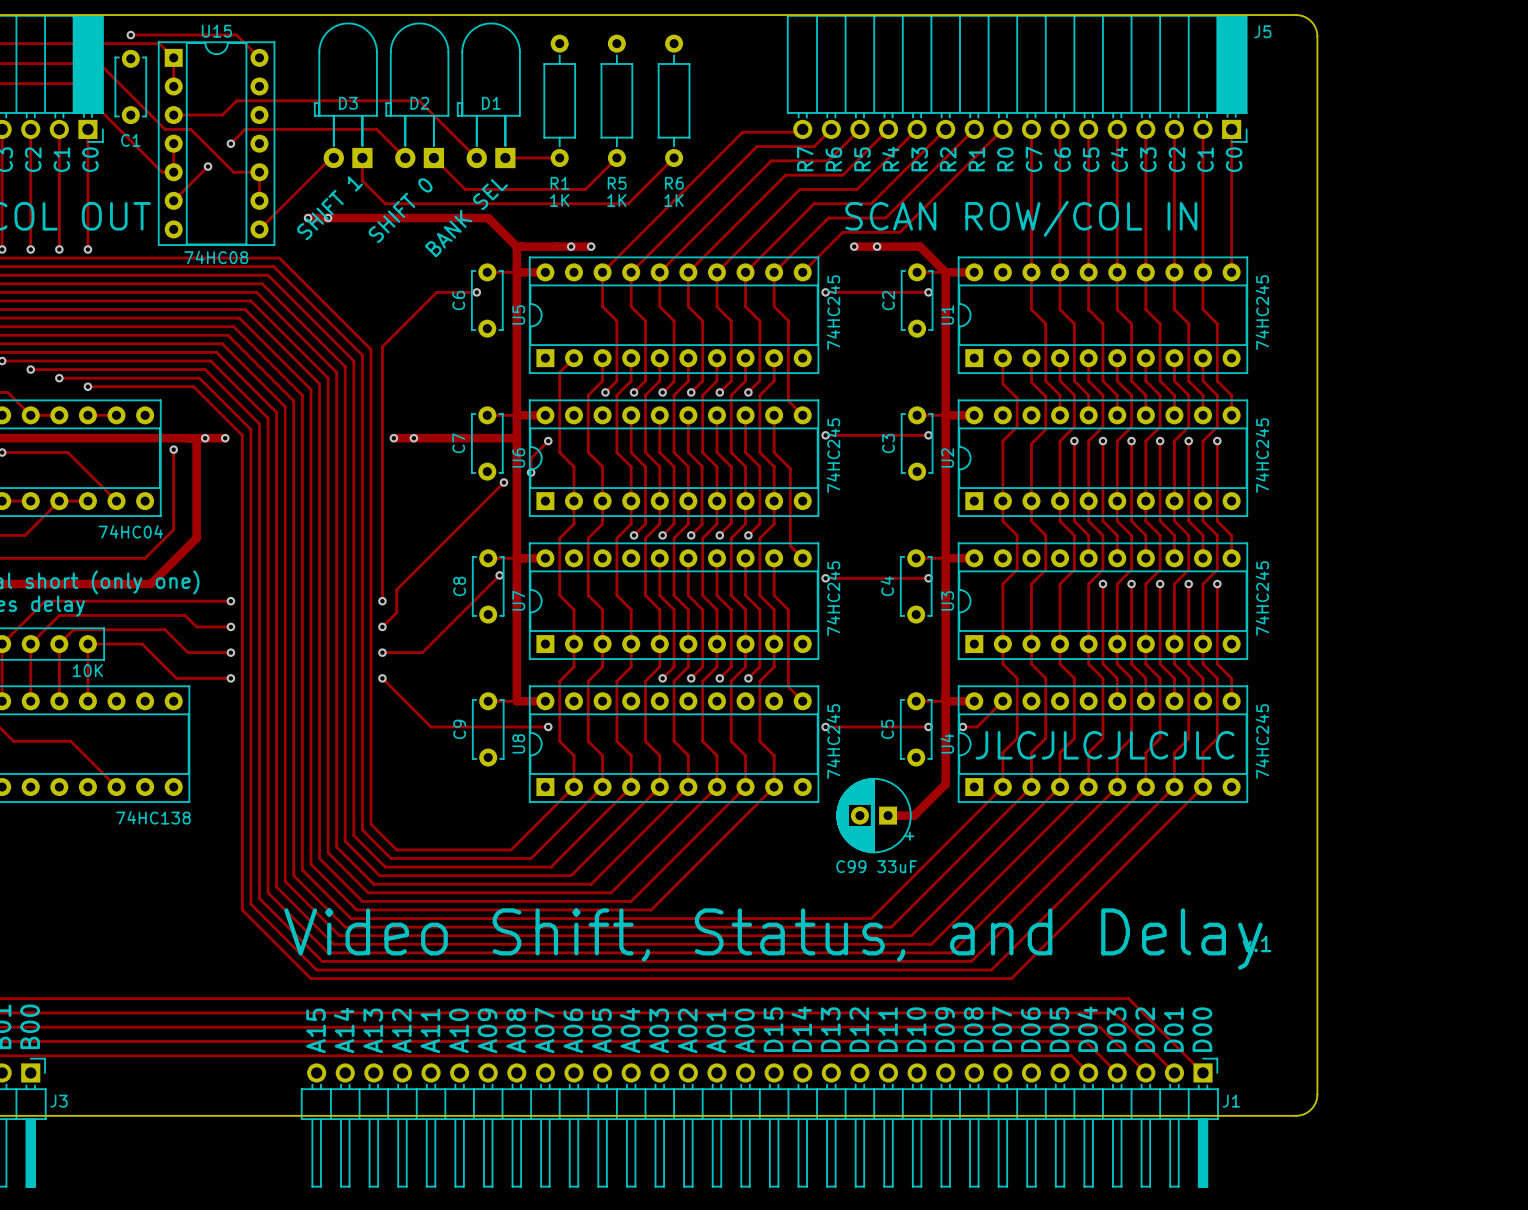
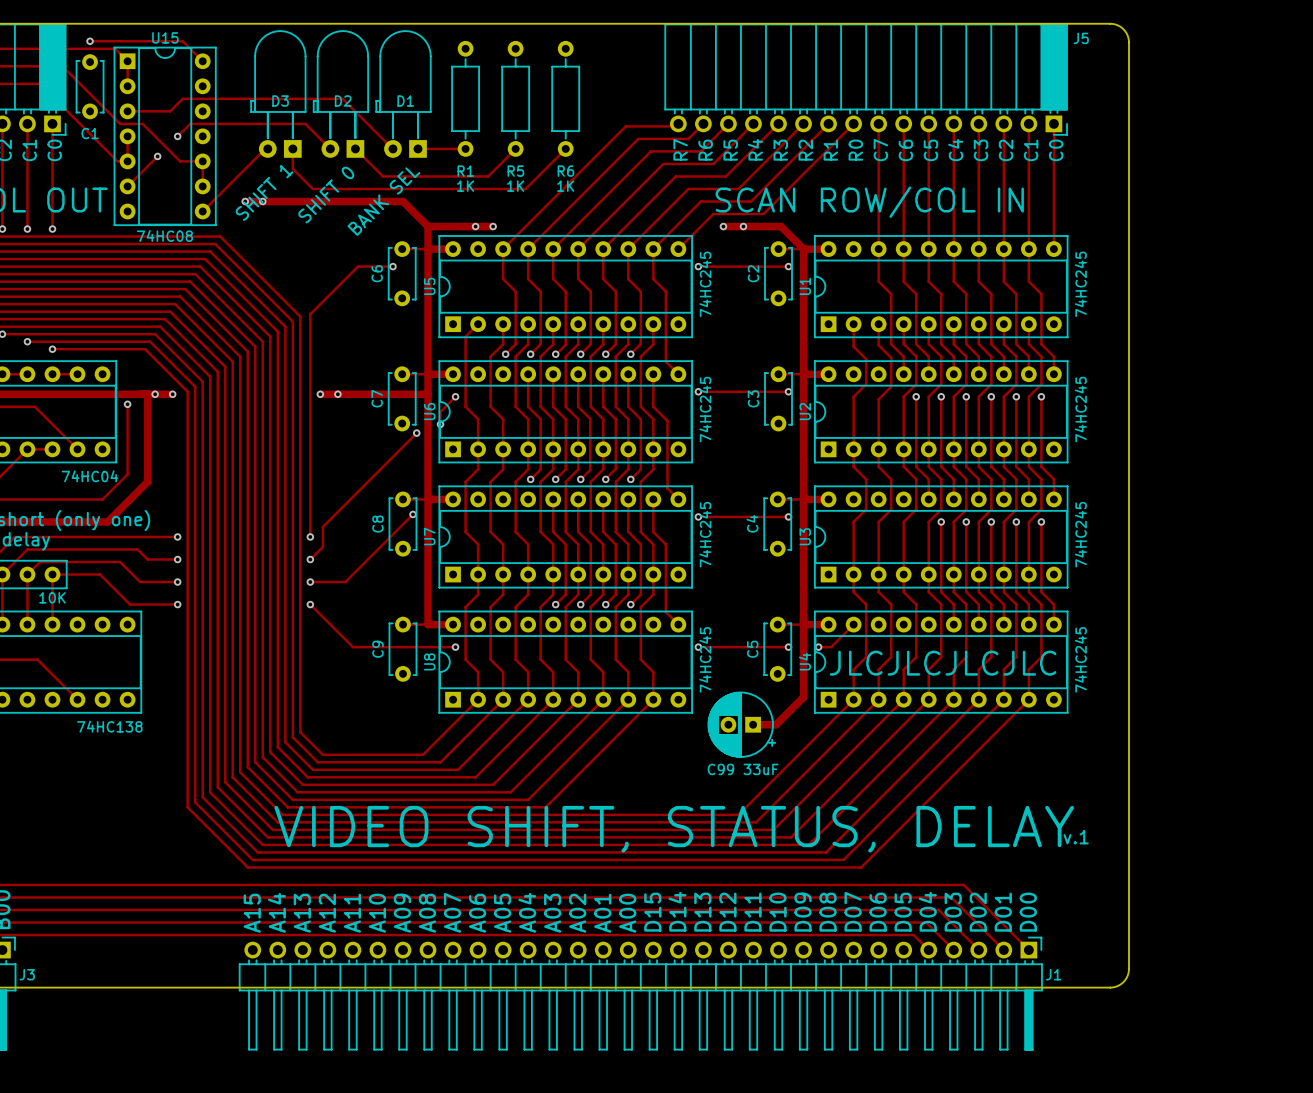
text: none -> VIDEO SHIFT, STATUS, DELAY (674, 829)
text: Video Shift, Status, and Delay (773, 939) -> none

